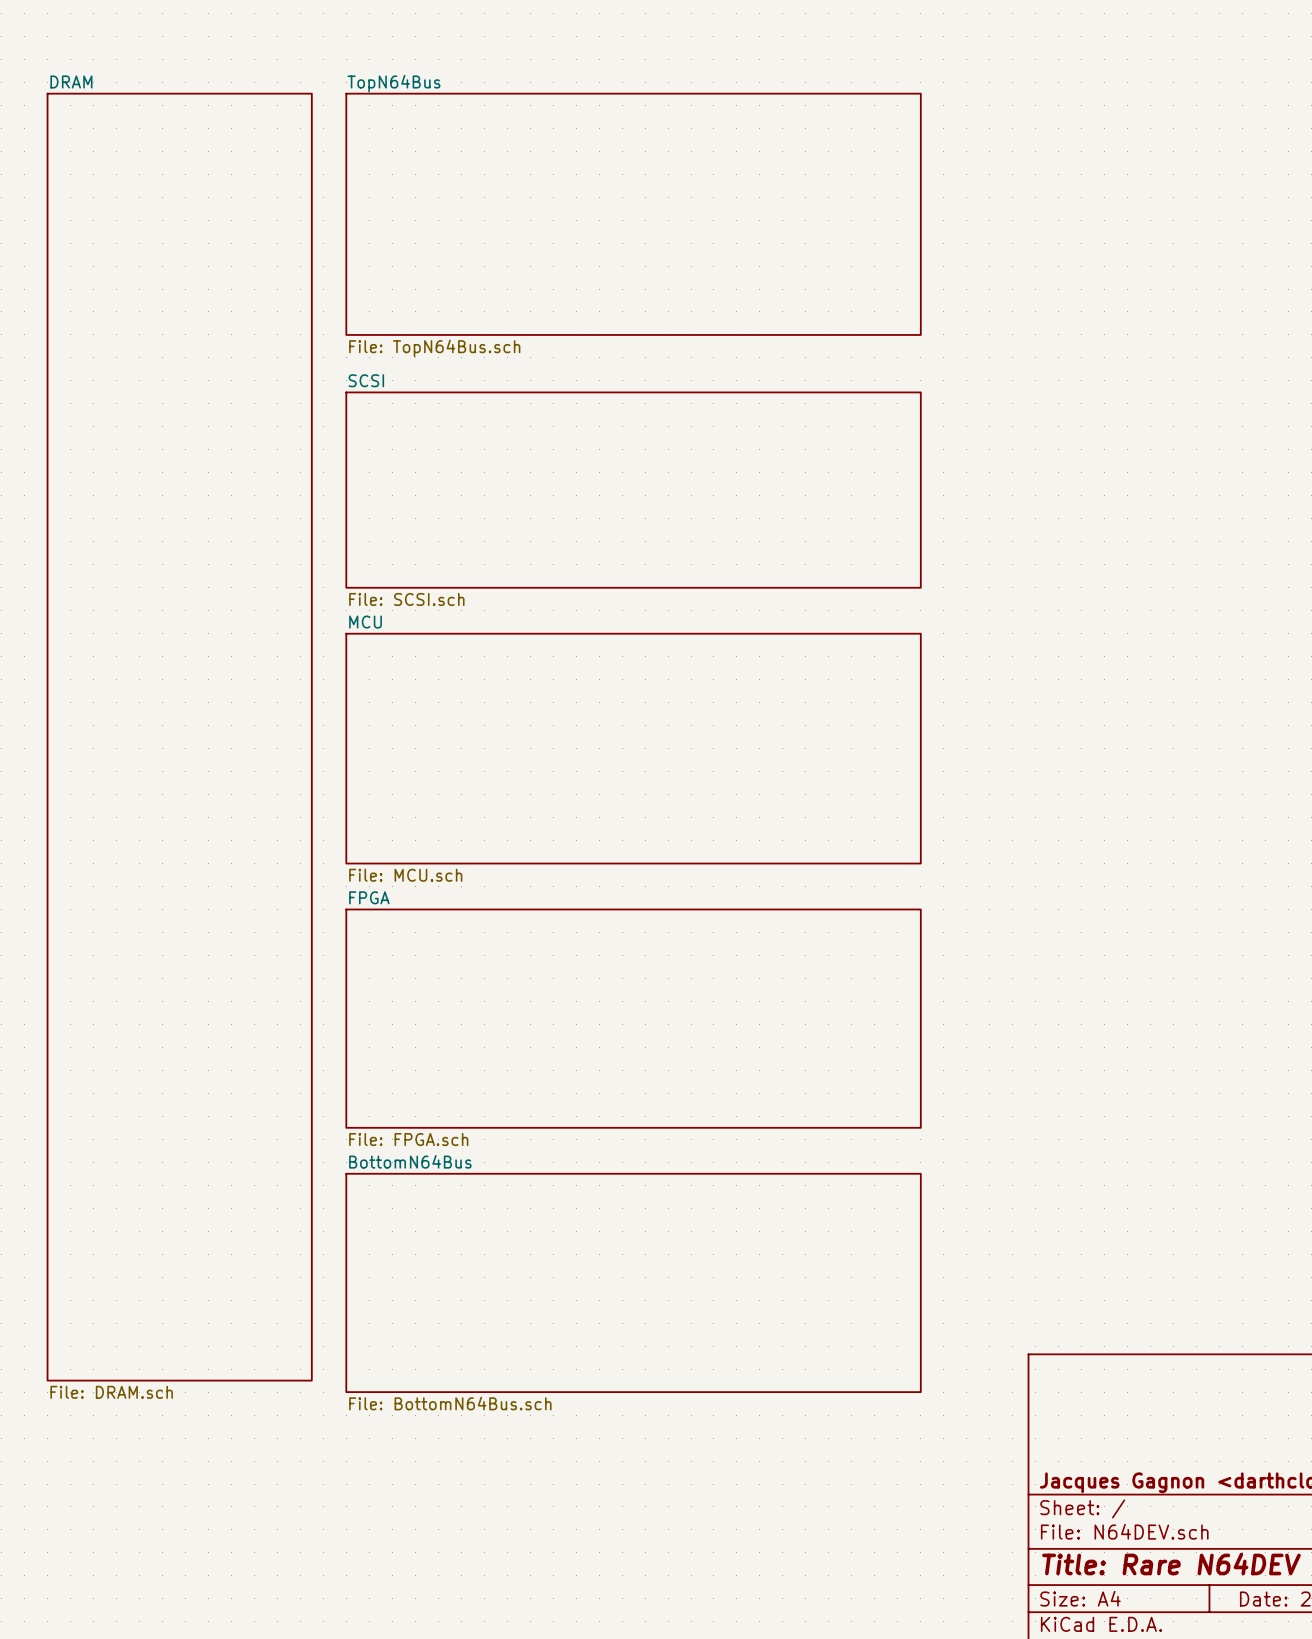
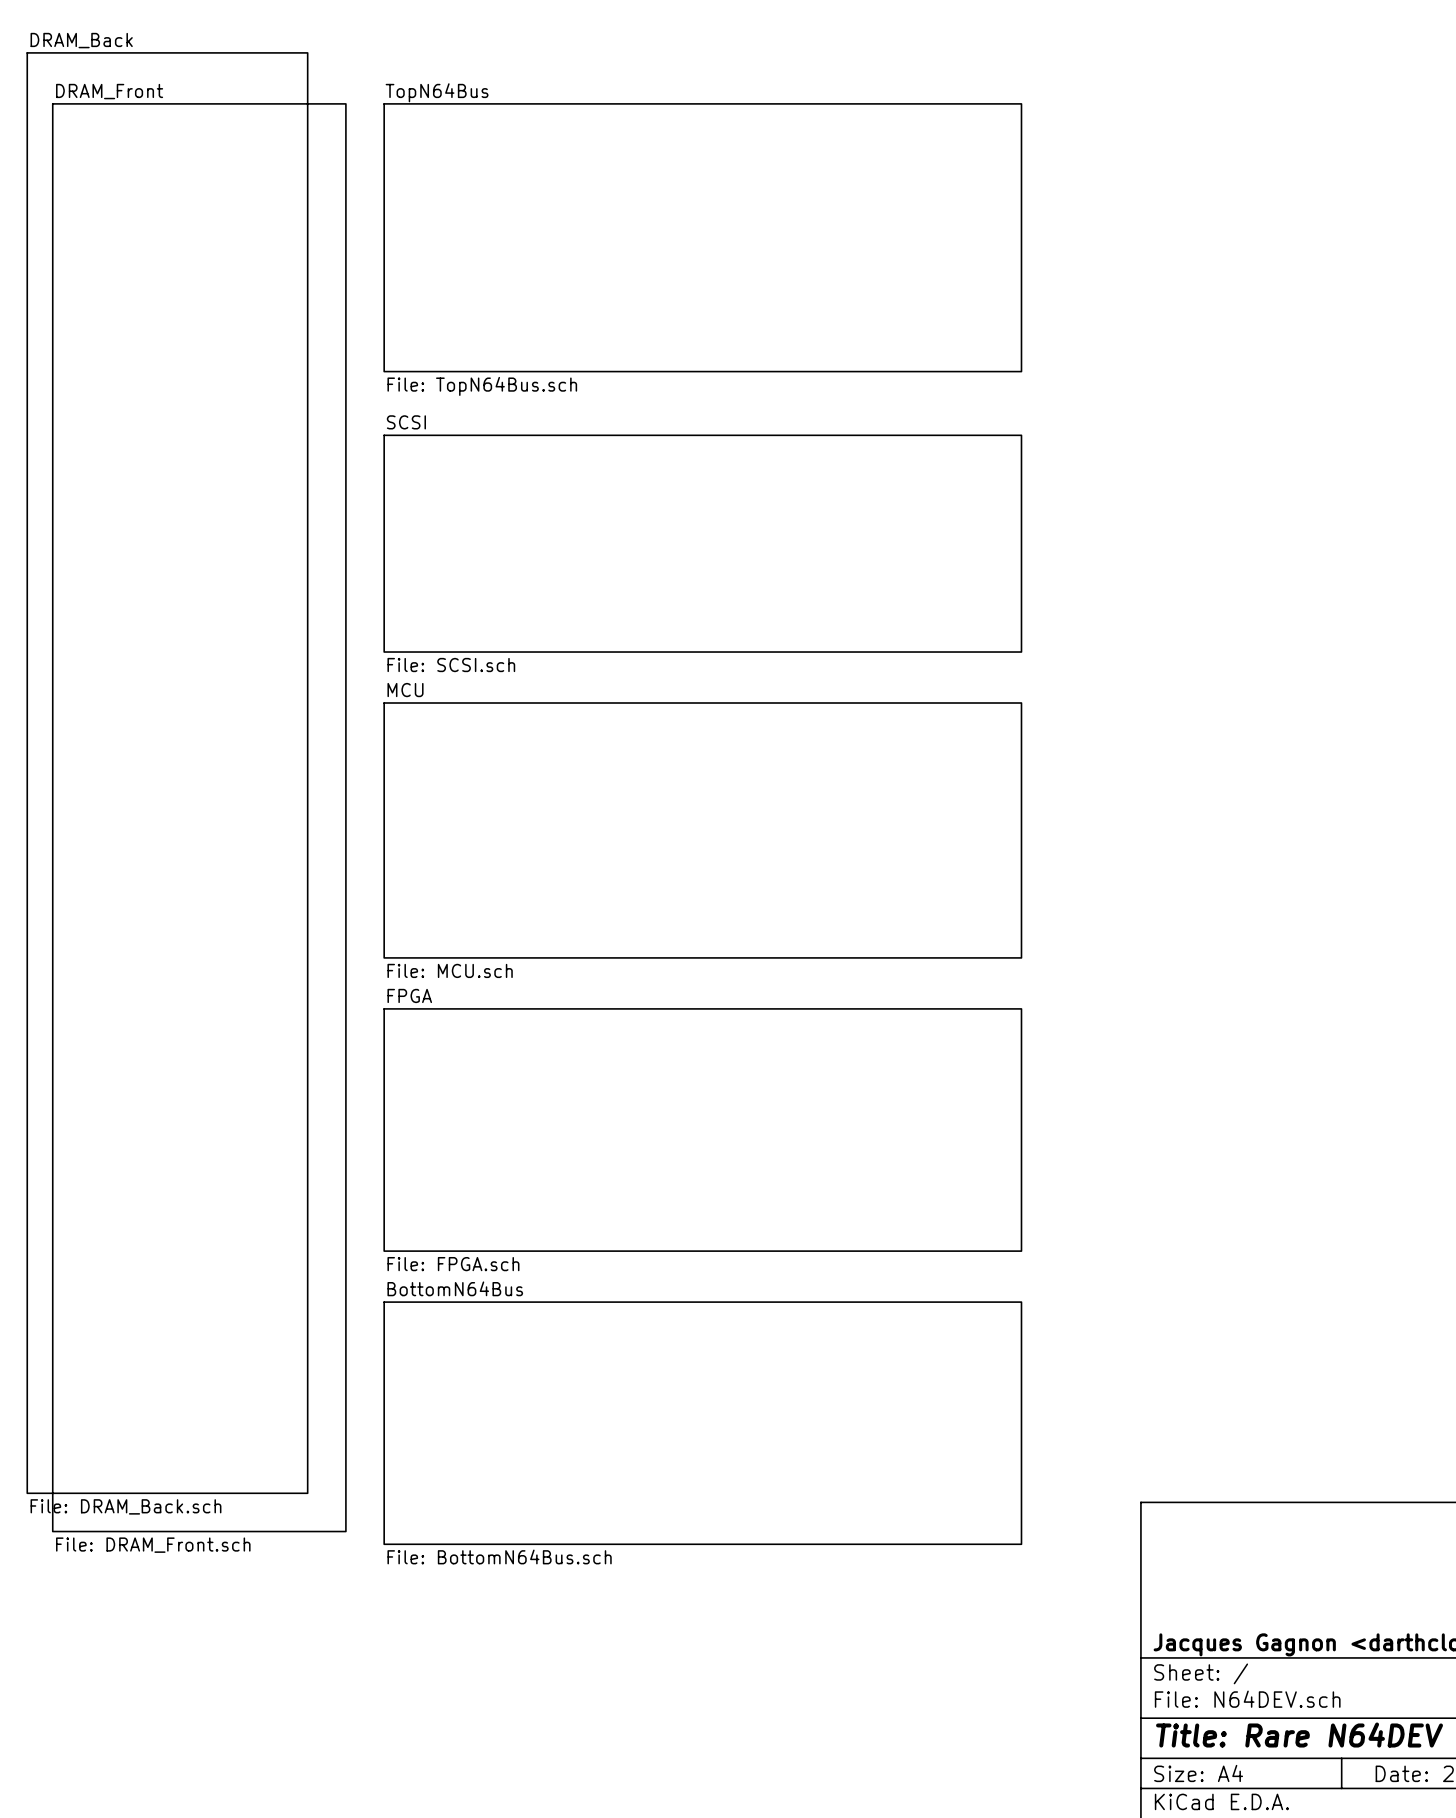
sheet DRAM name: DRAM (71, 81) -> DRAM_Front (109, 91)
sheet DRAM_Back: none -> File: DRAM_Back.sch (167, 773)
sheet DRAM value: File: DRAM.sch (111, 1392) -> File: DRAM_Front.sch (153, 1545)

